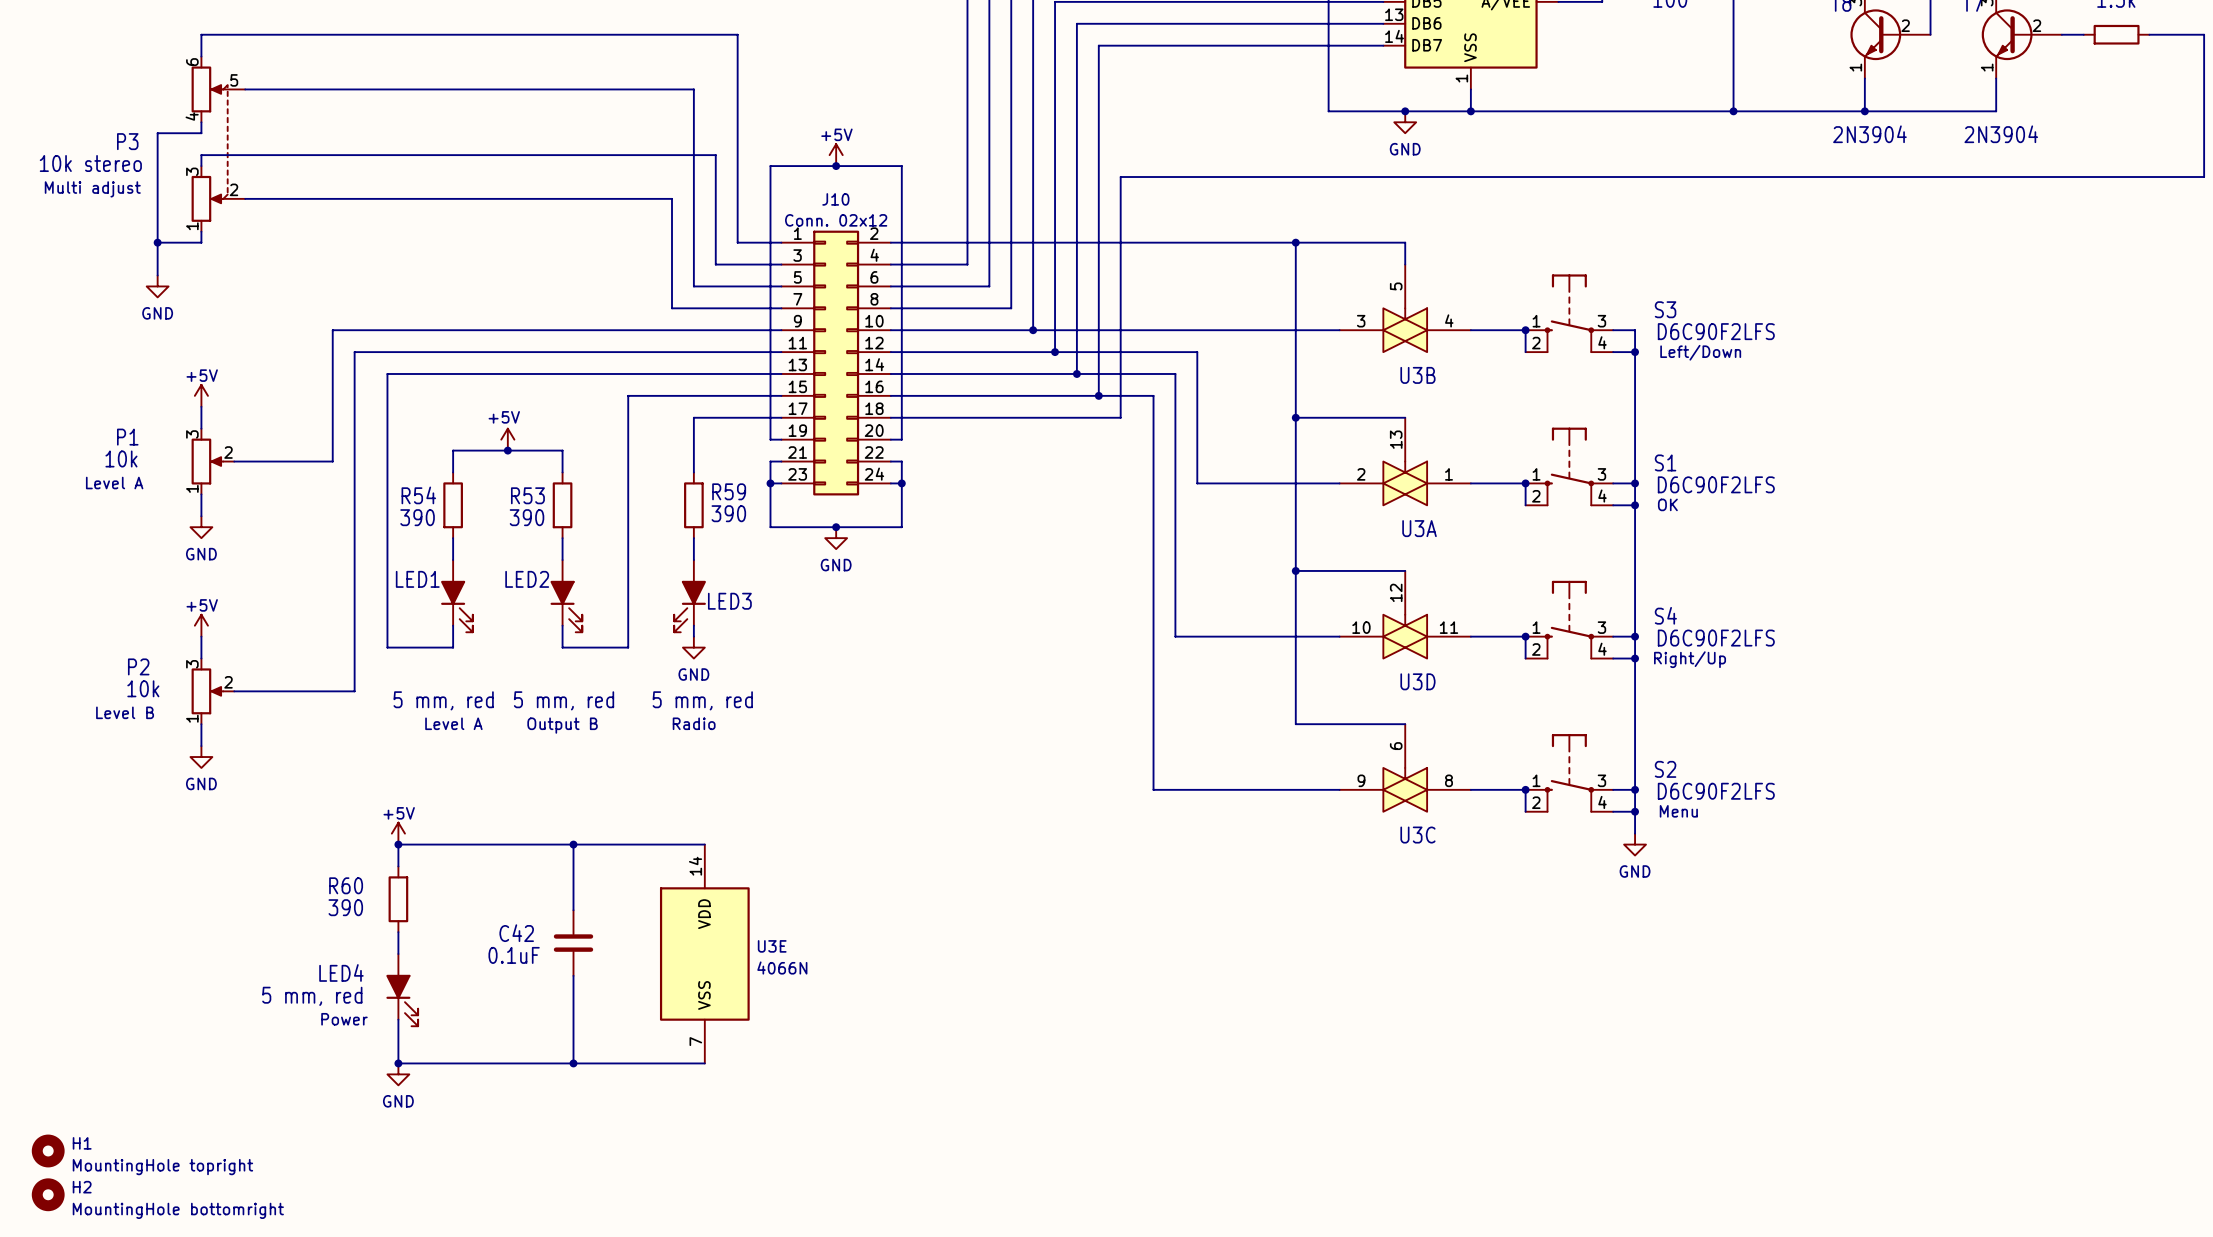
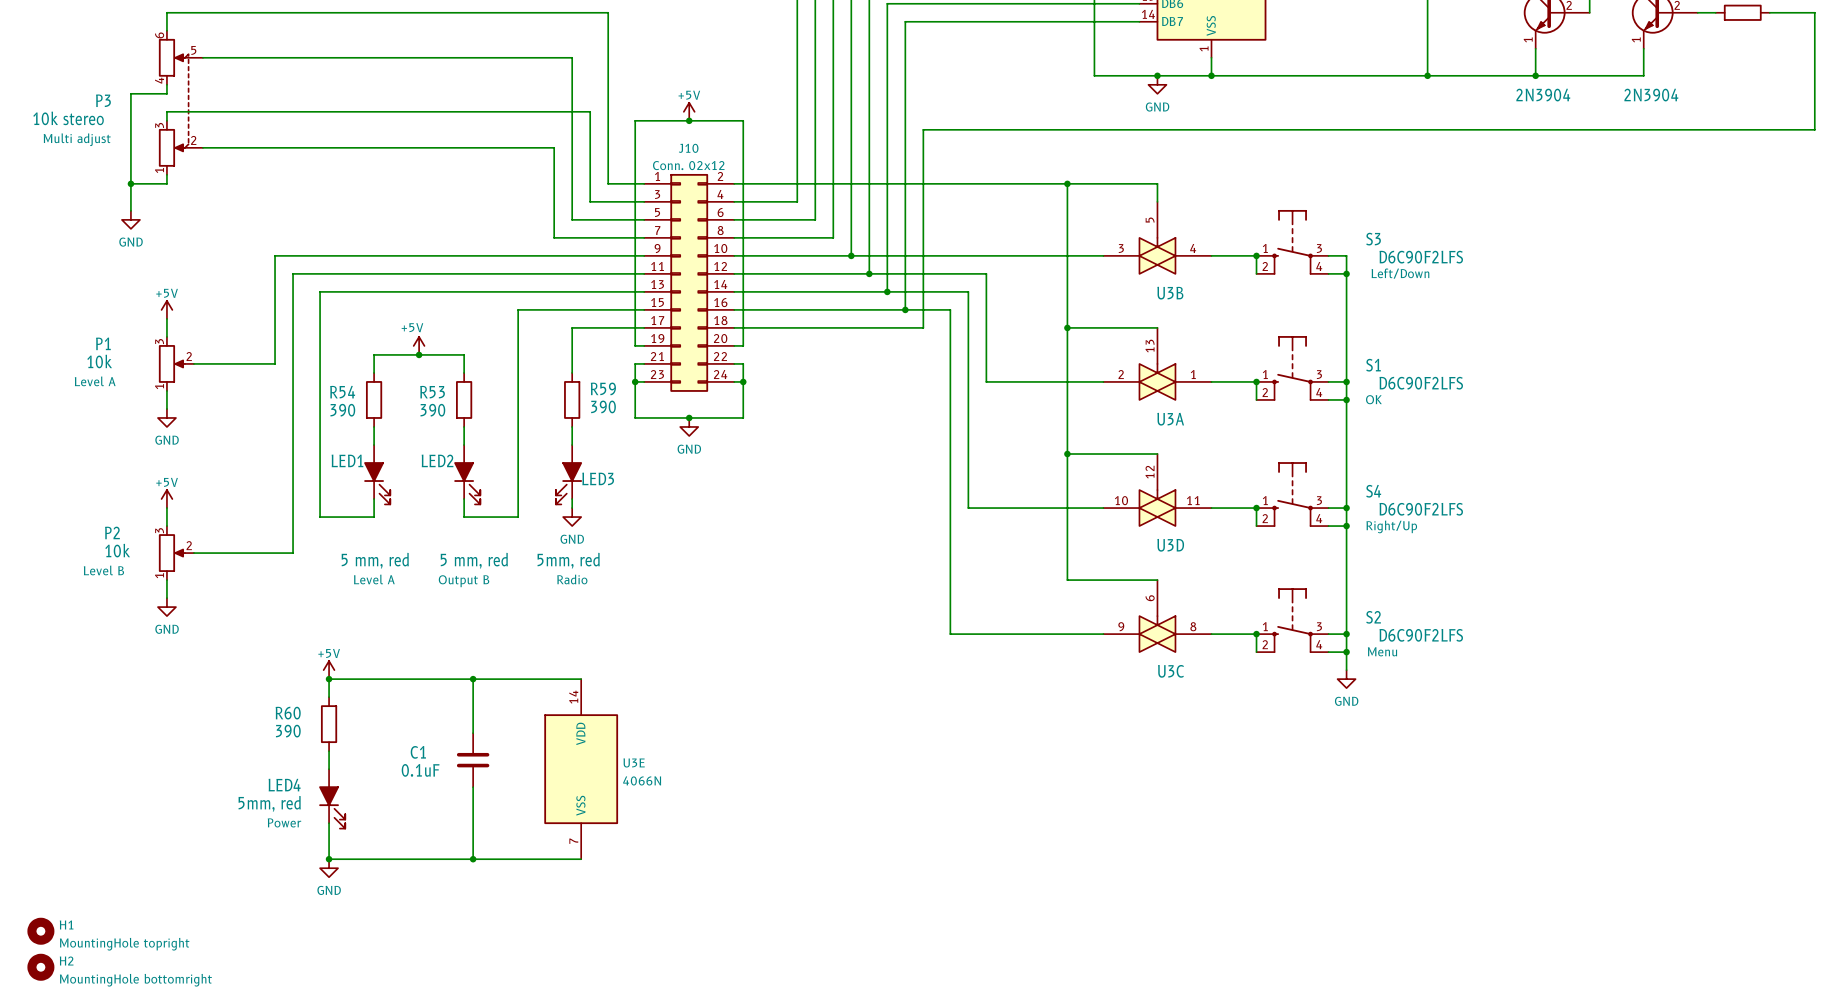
LED3 value: 5 mm, red (702, 700) -> 5mm, red (568, 560)
C42 name: C42 (516, 933) -> C1 (418, 752)
LED4 value: 5 mm, red (312, 996) -> 5mm, red (269, 803)

